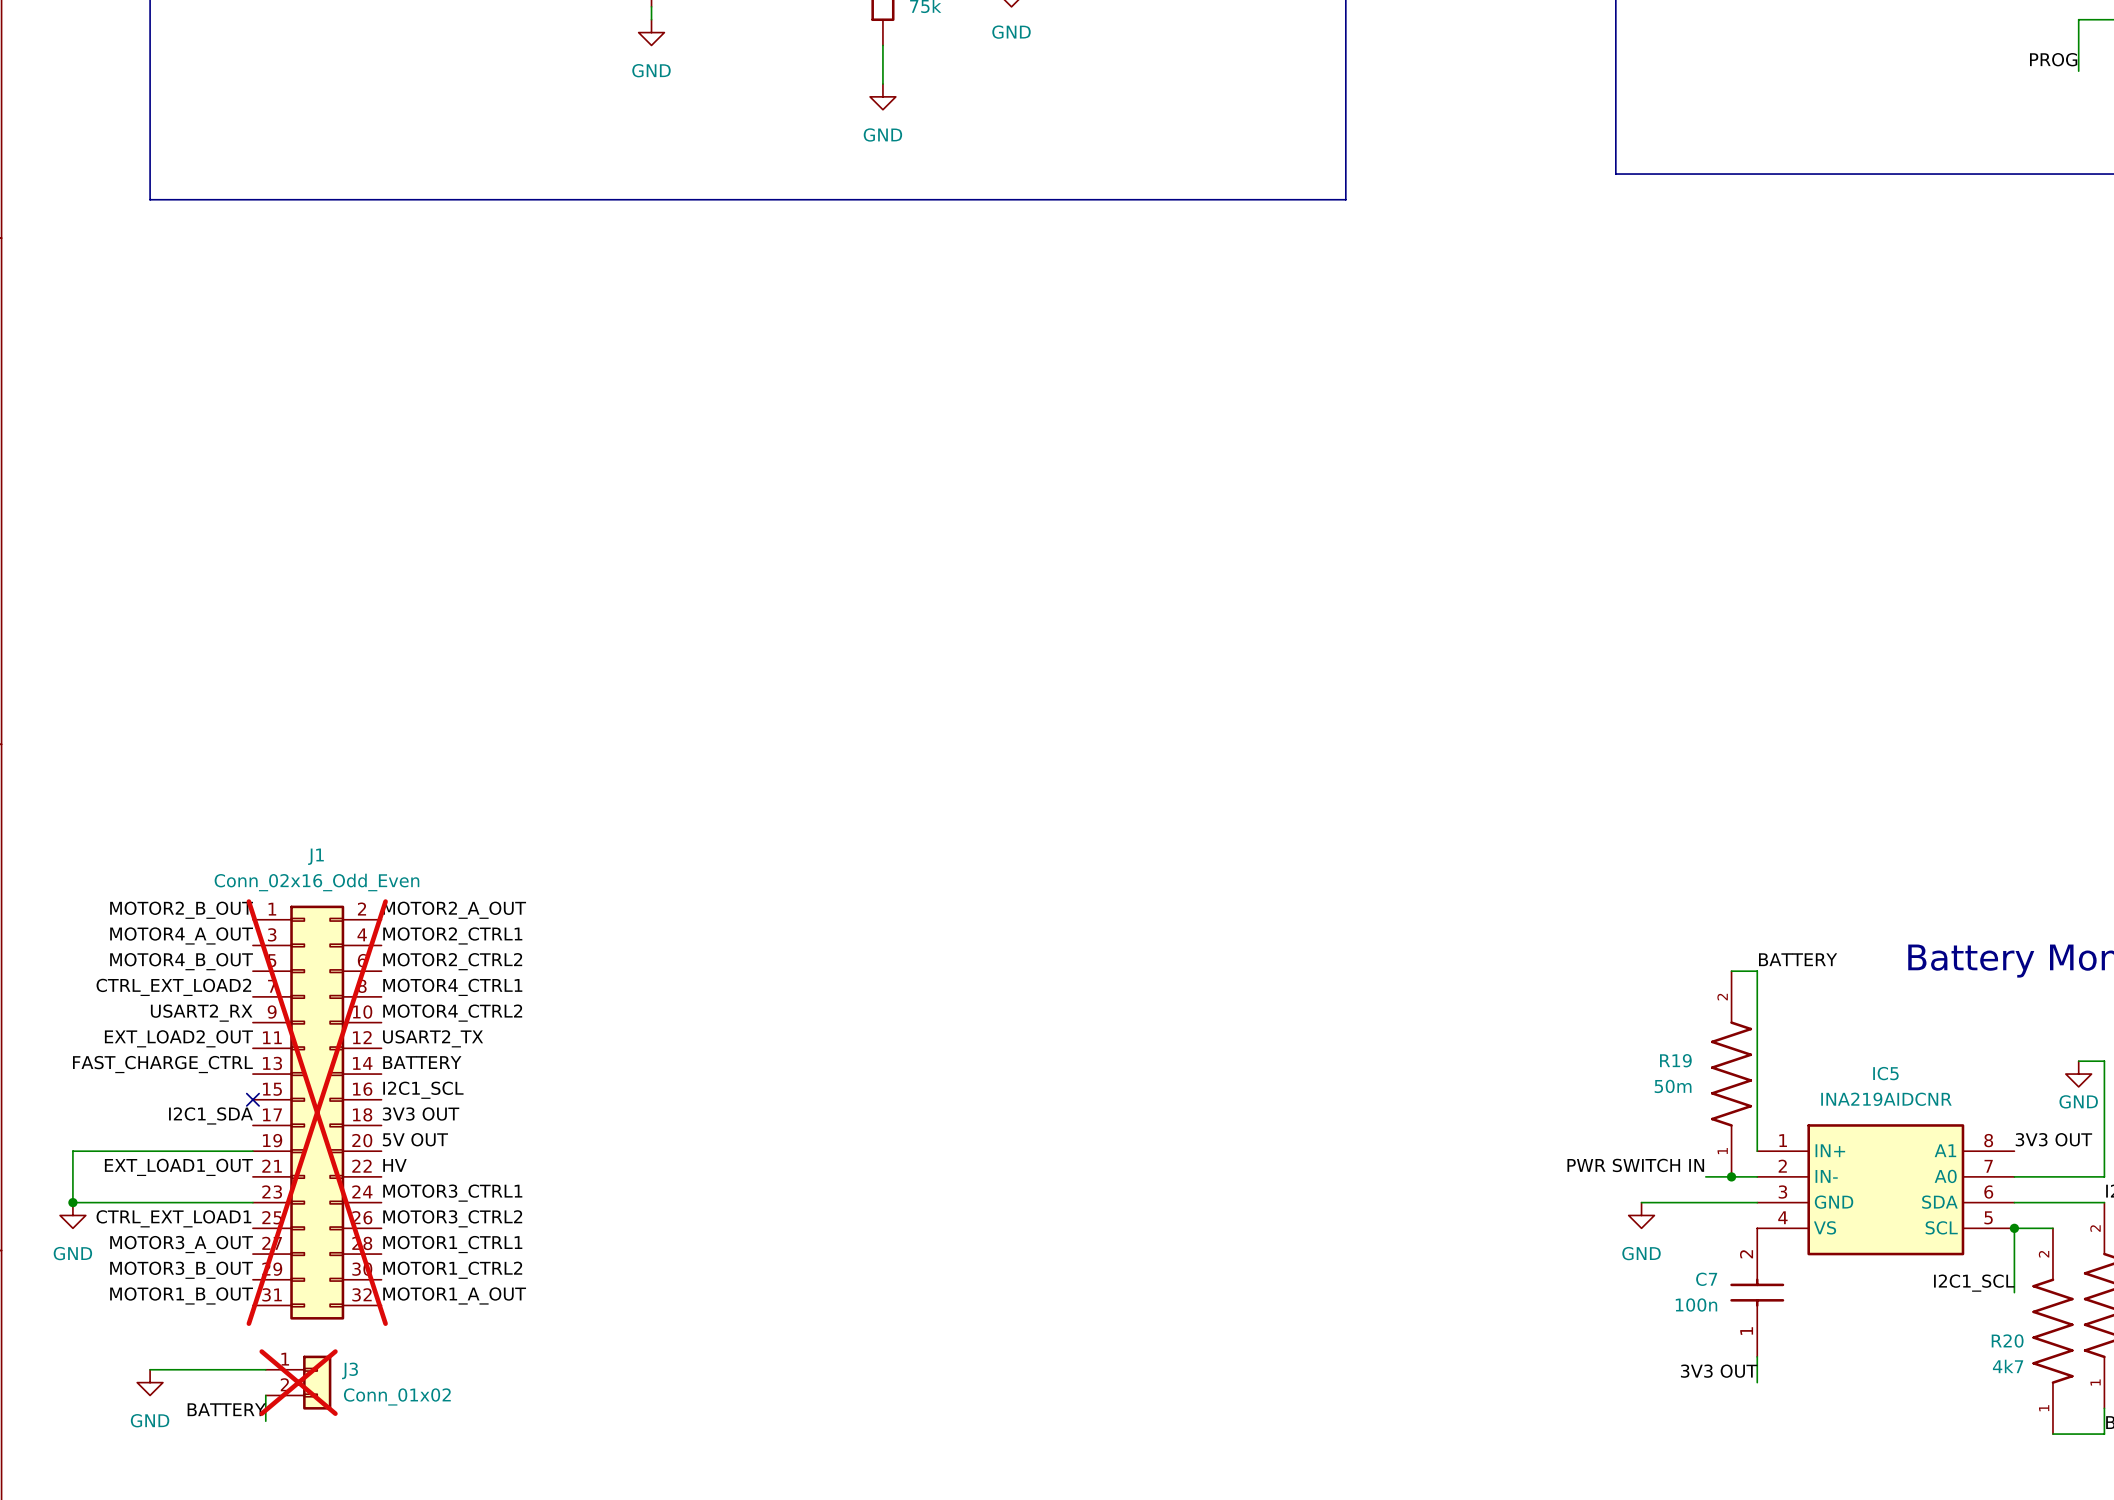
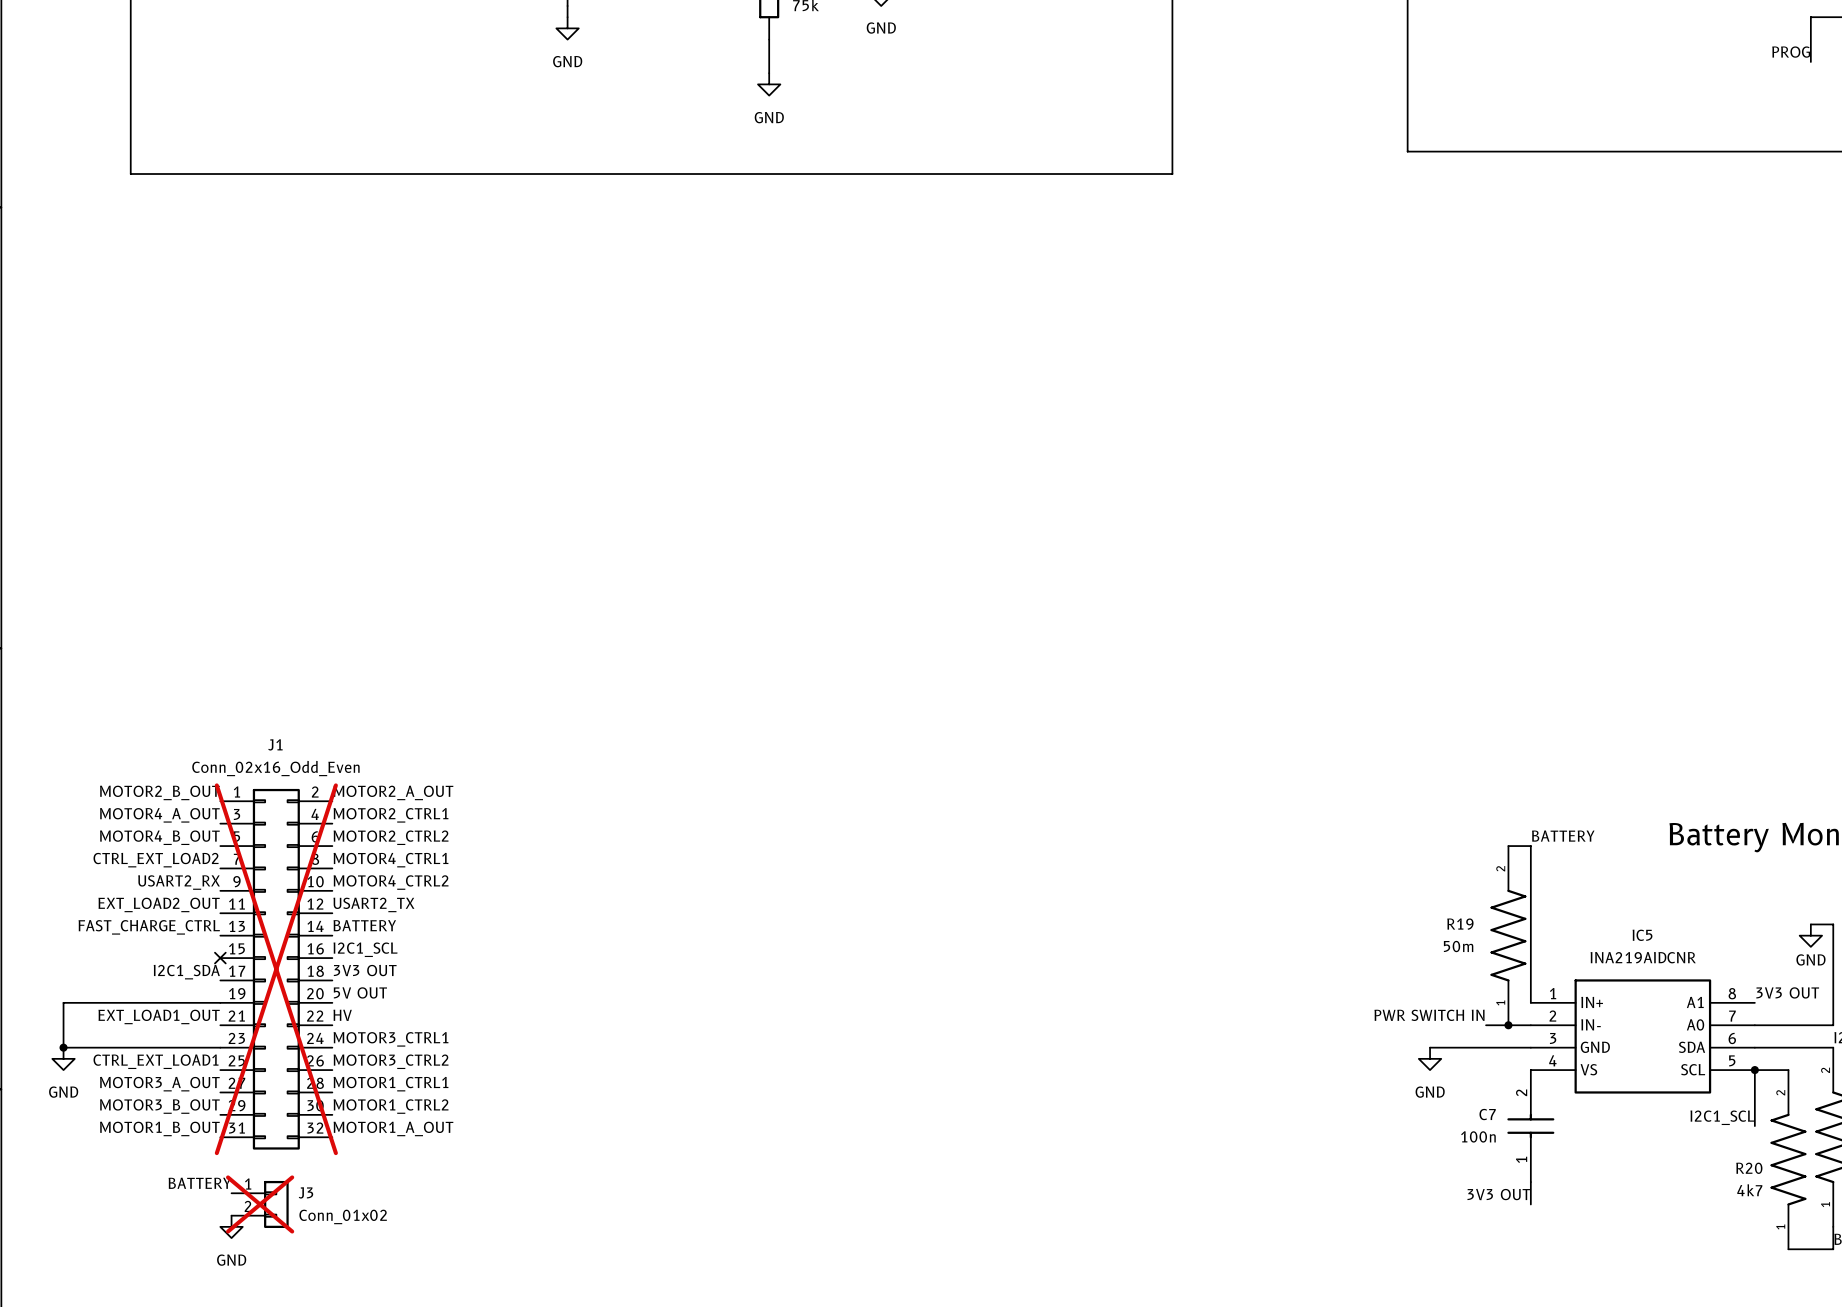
wire: (150, 1369) (265, 1369) -> none
power symbol position: GND (150, 1382) -> GND (231, 1226)
label position: BATTERY (226, 1409) -> BATTERY (199, 1183)

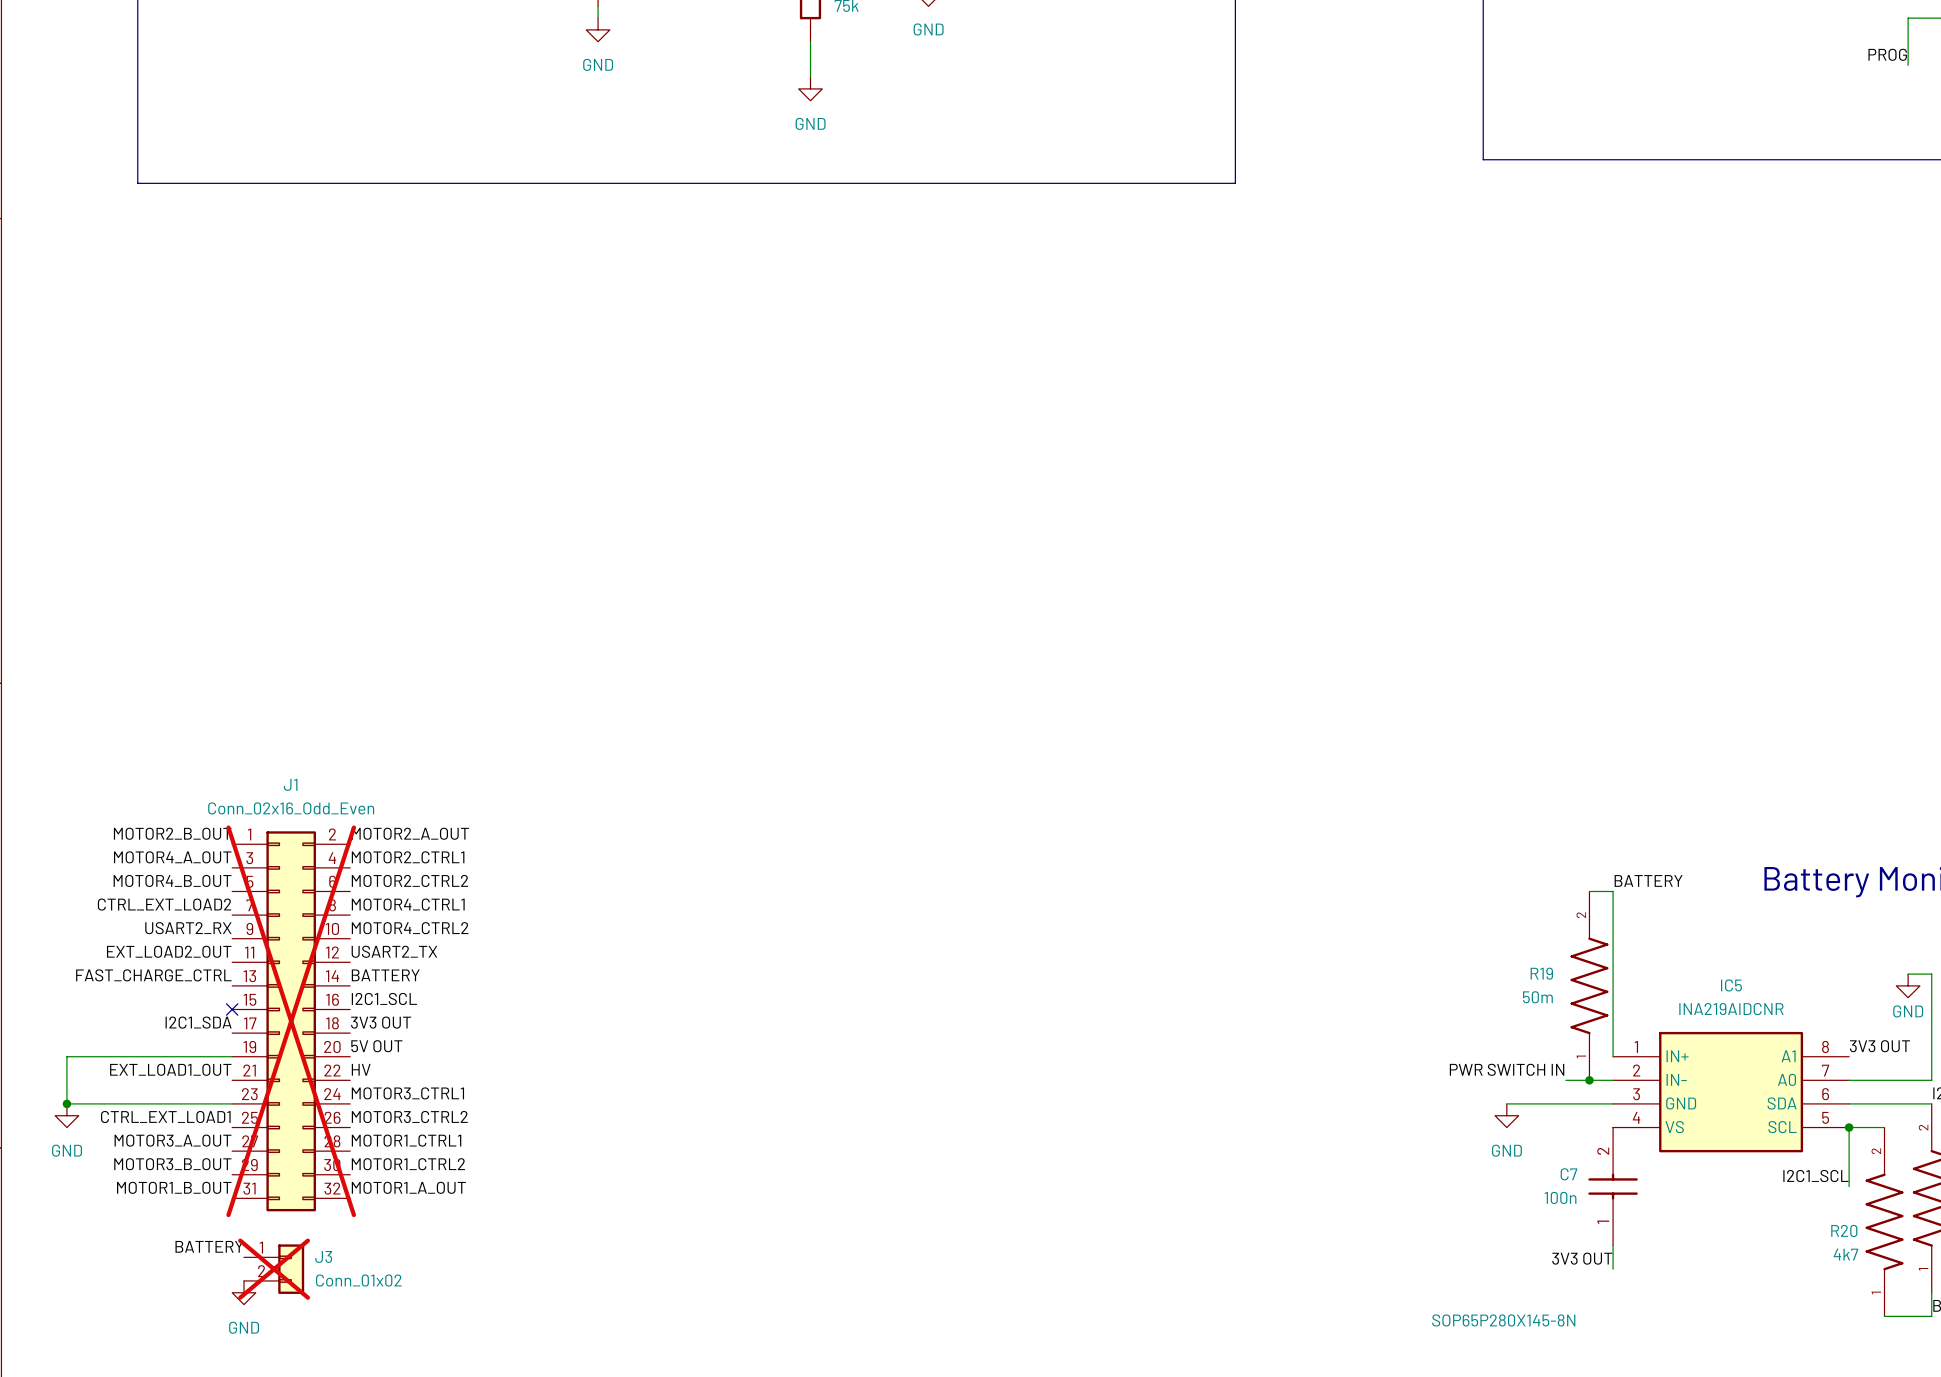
IC5 text: none -> SOP65P280X145-8N (1503, 1320)

